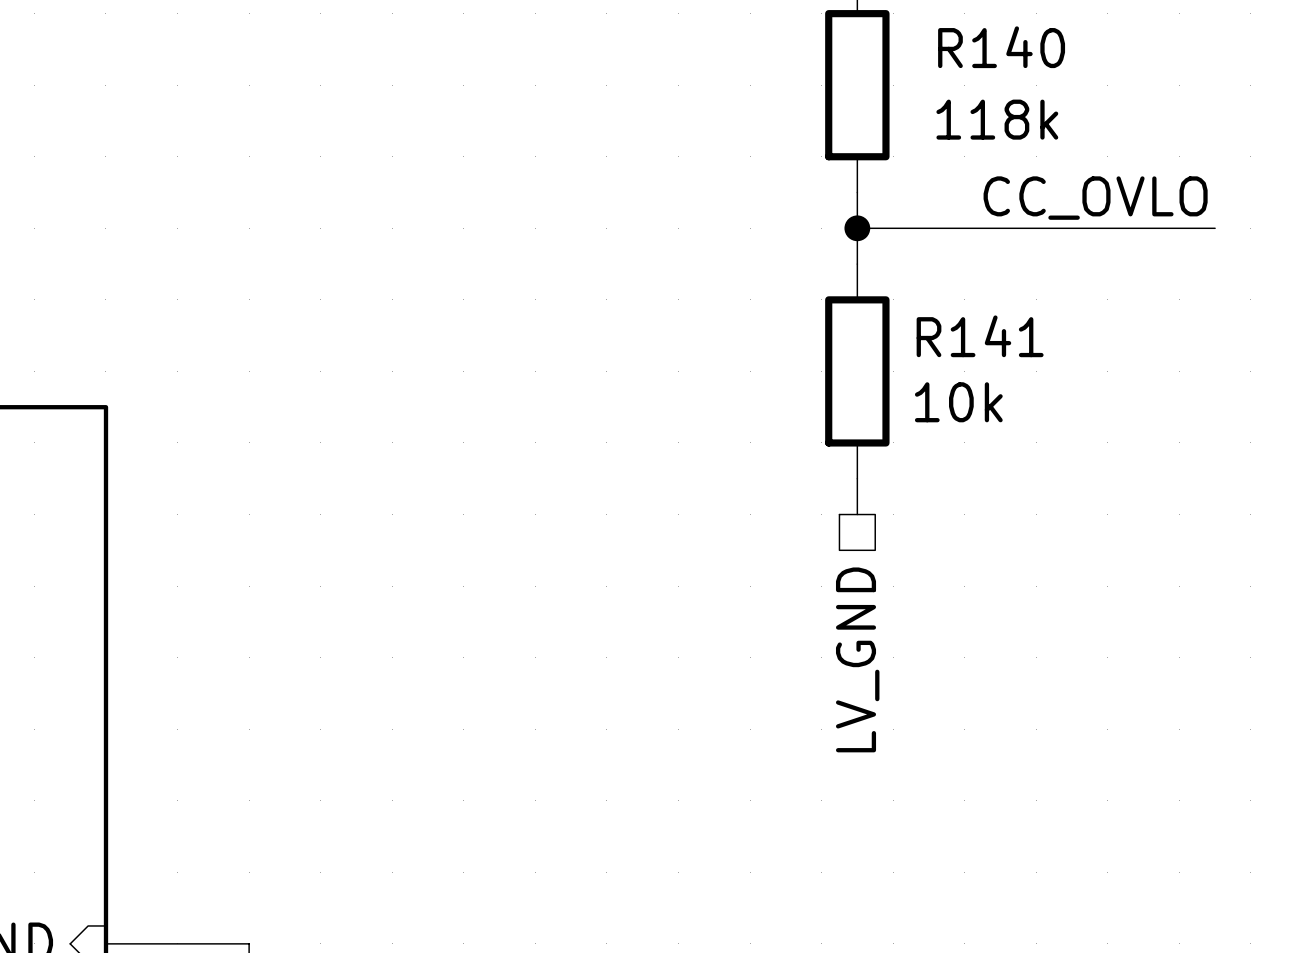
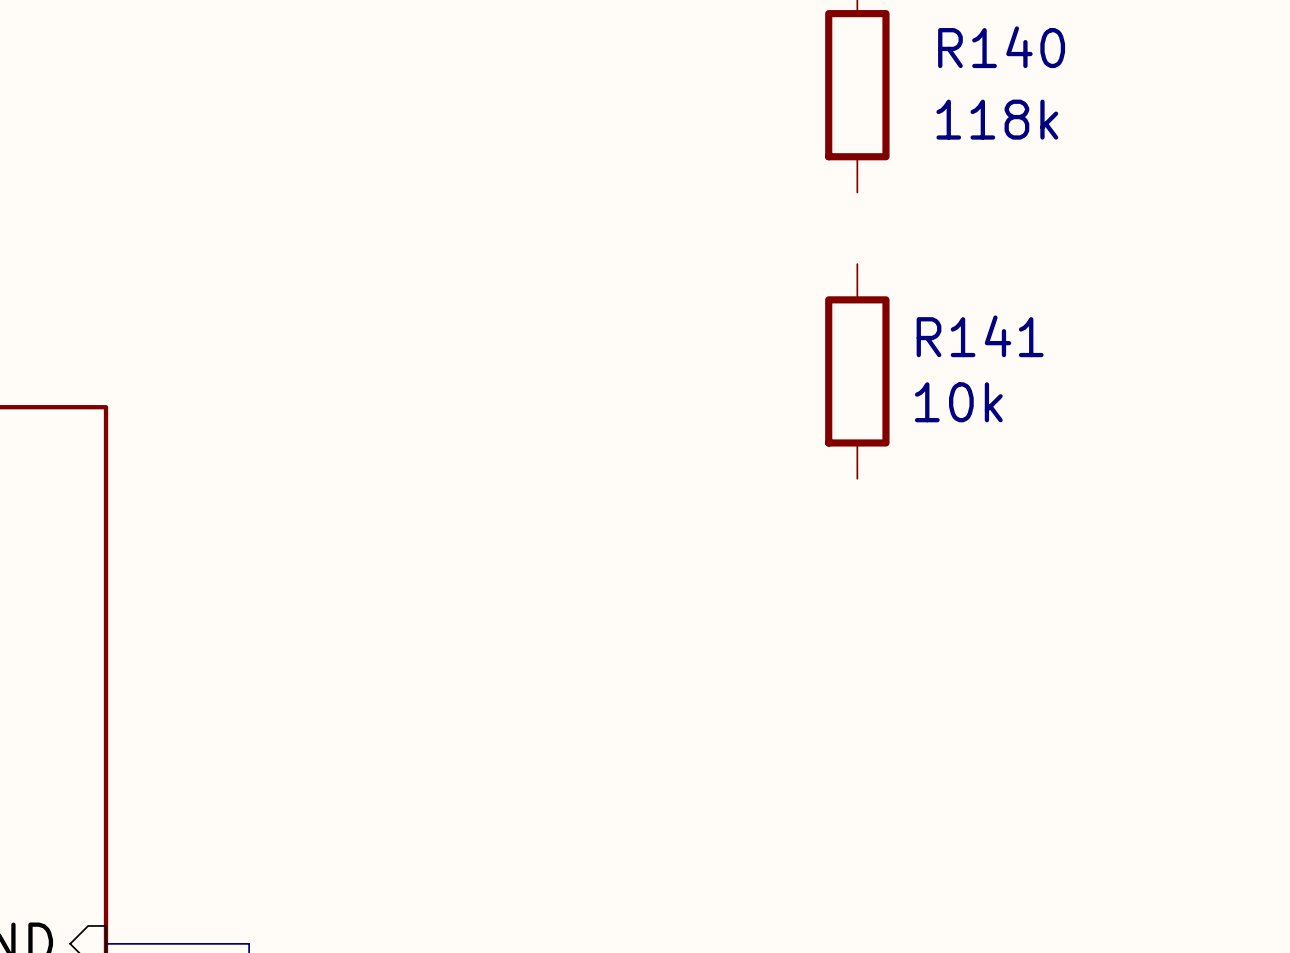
wire: (857, 192) (857, 264) -> none
label: CC_OVLO (1095, 198) -> none
wire: (857, 228) (1215, 228) -> none
junction: (857, 228) -> none
wire: (857, 478) (857, 514) -> none
hierarchical label: LV_GND (857, 659) -> none

